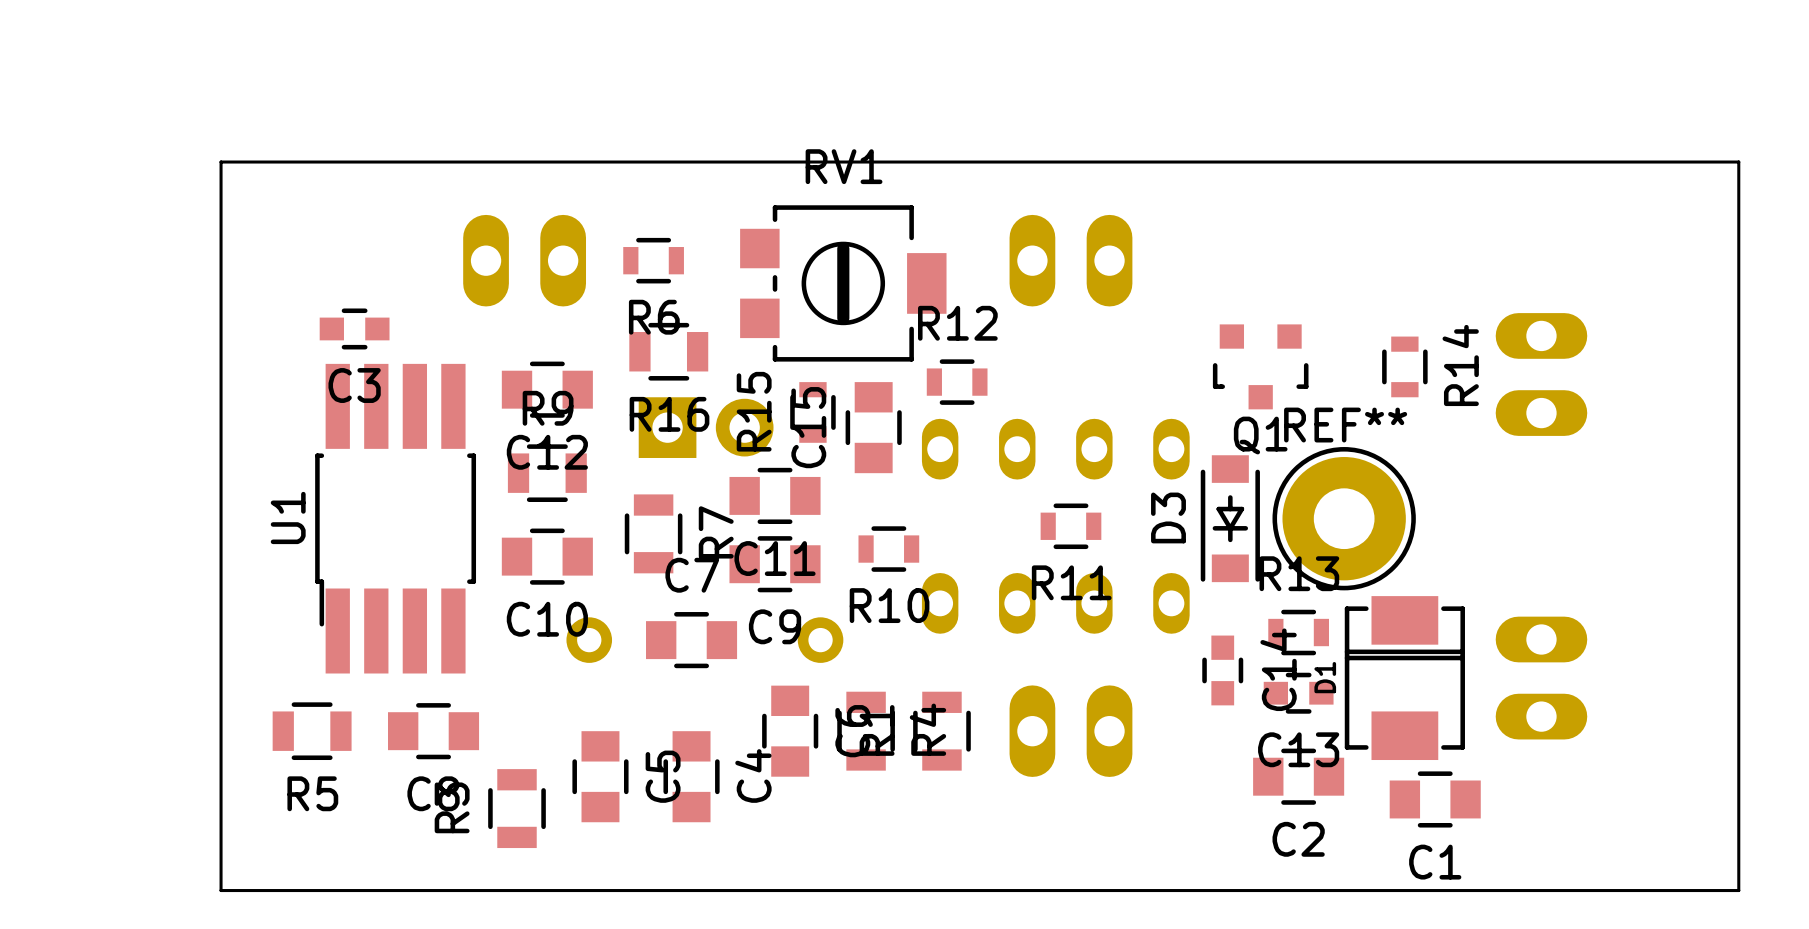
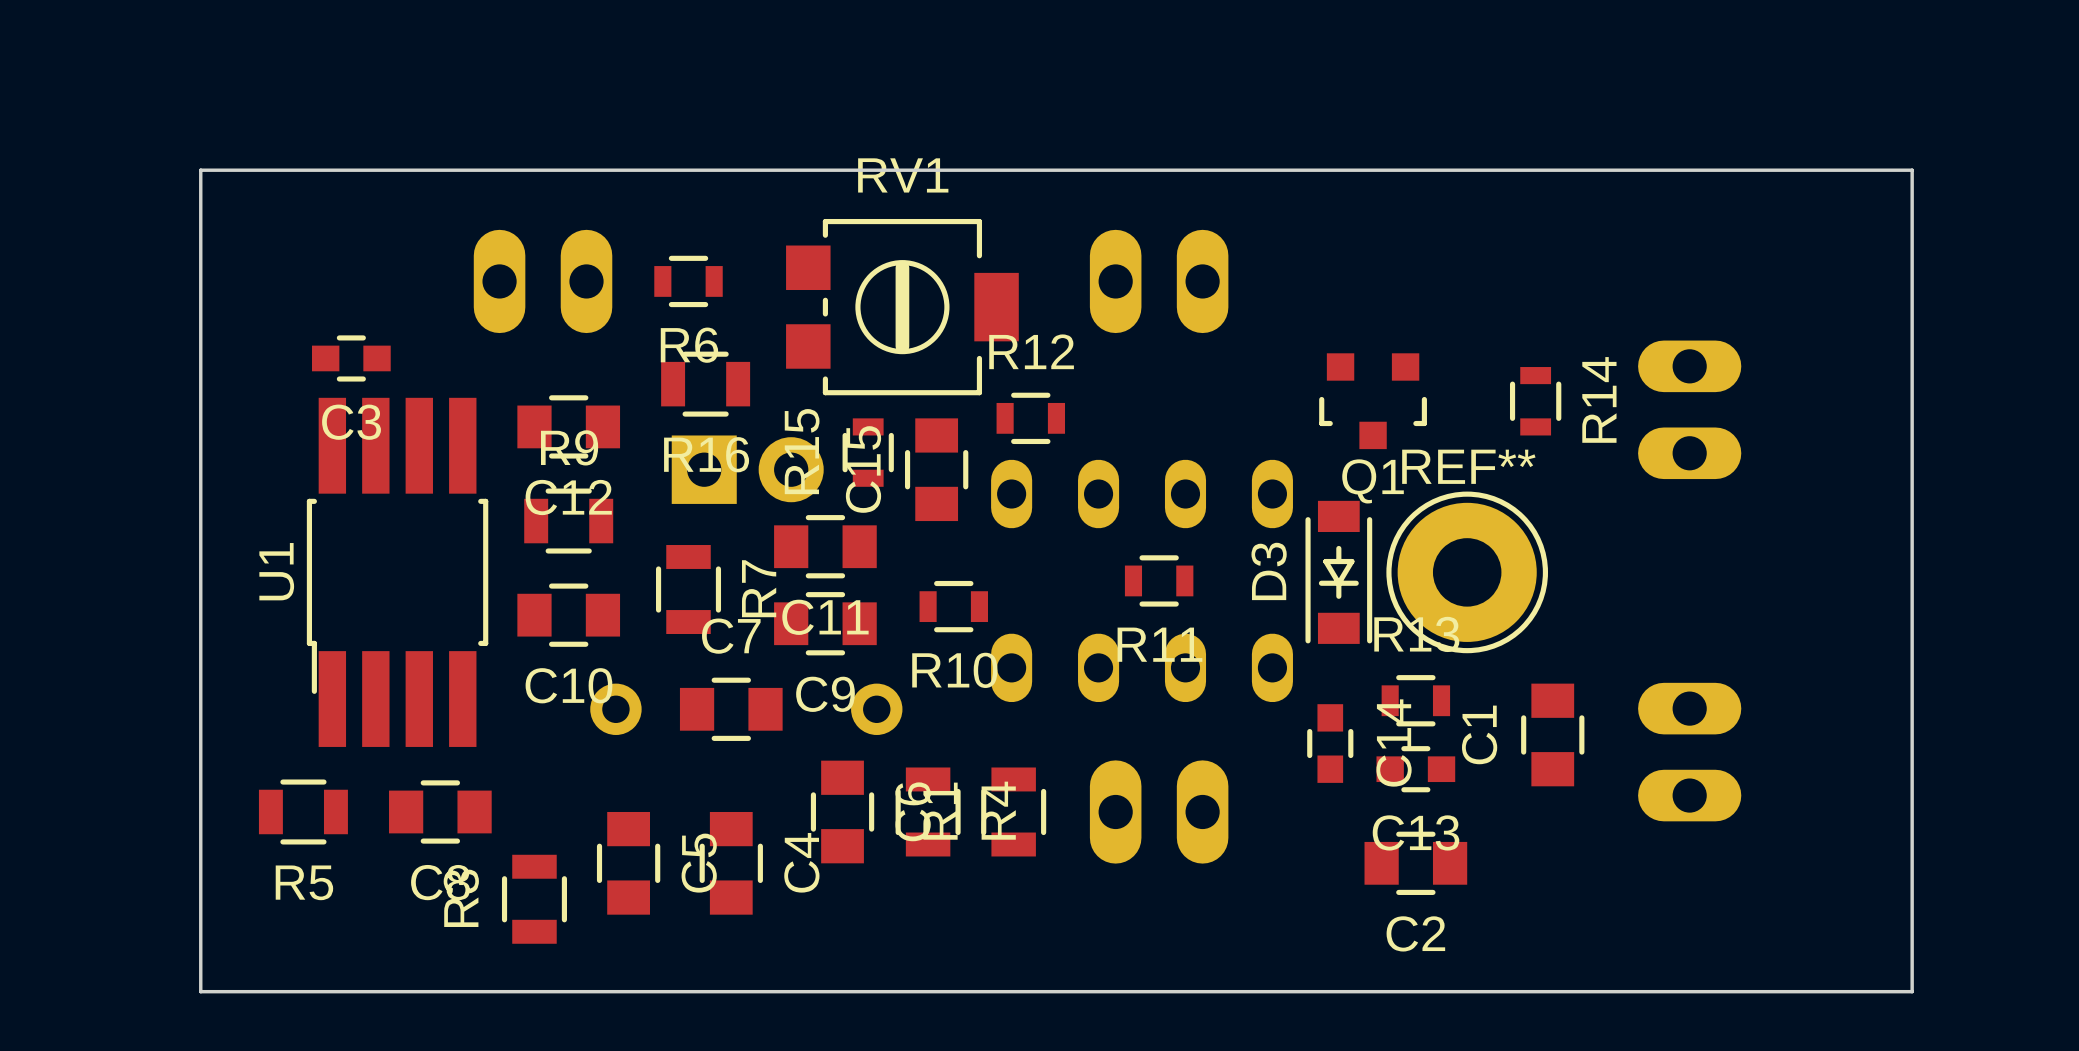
D1: (1404, 678) -> none
C1 rotation: 0° (1435, 799) -> 90° clockwise (1552, 734)
C1 position: (1435, 799) -> (1552, 734)

